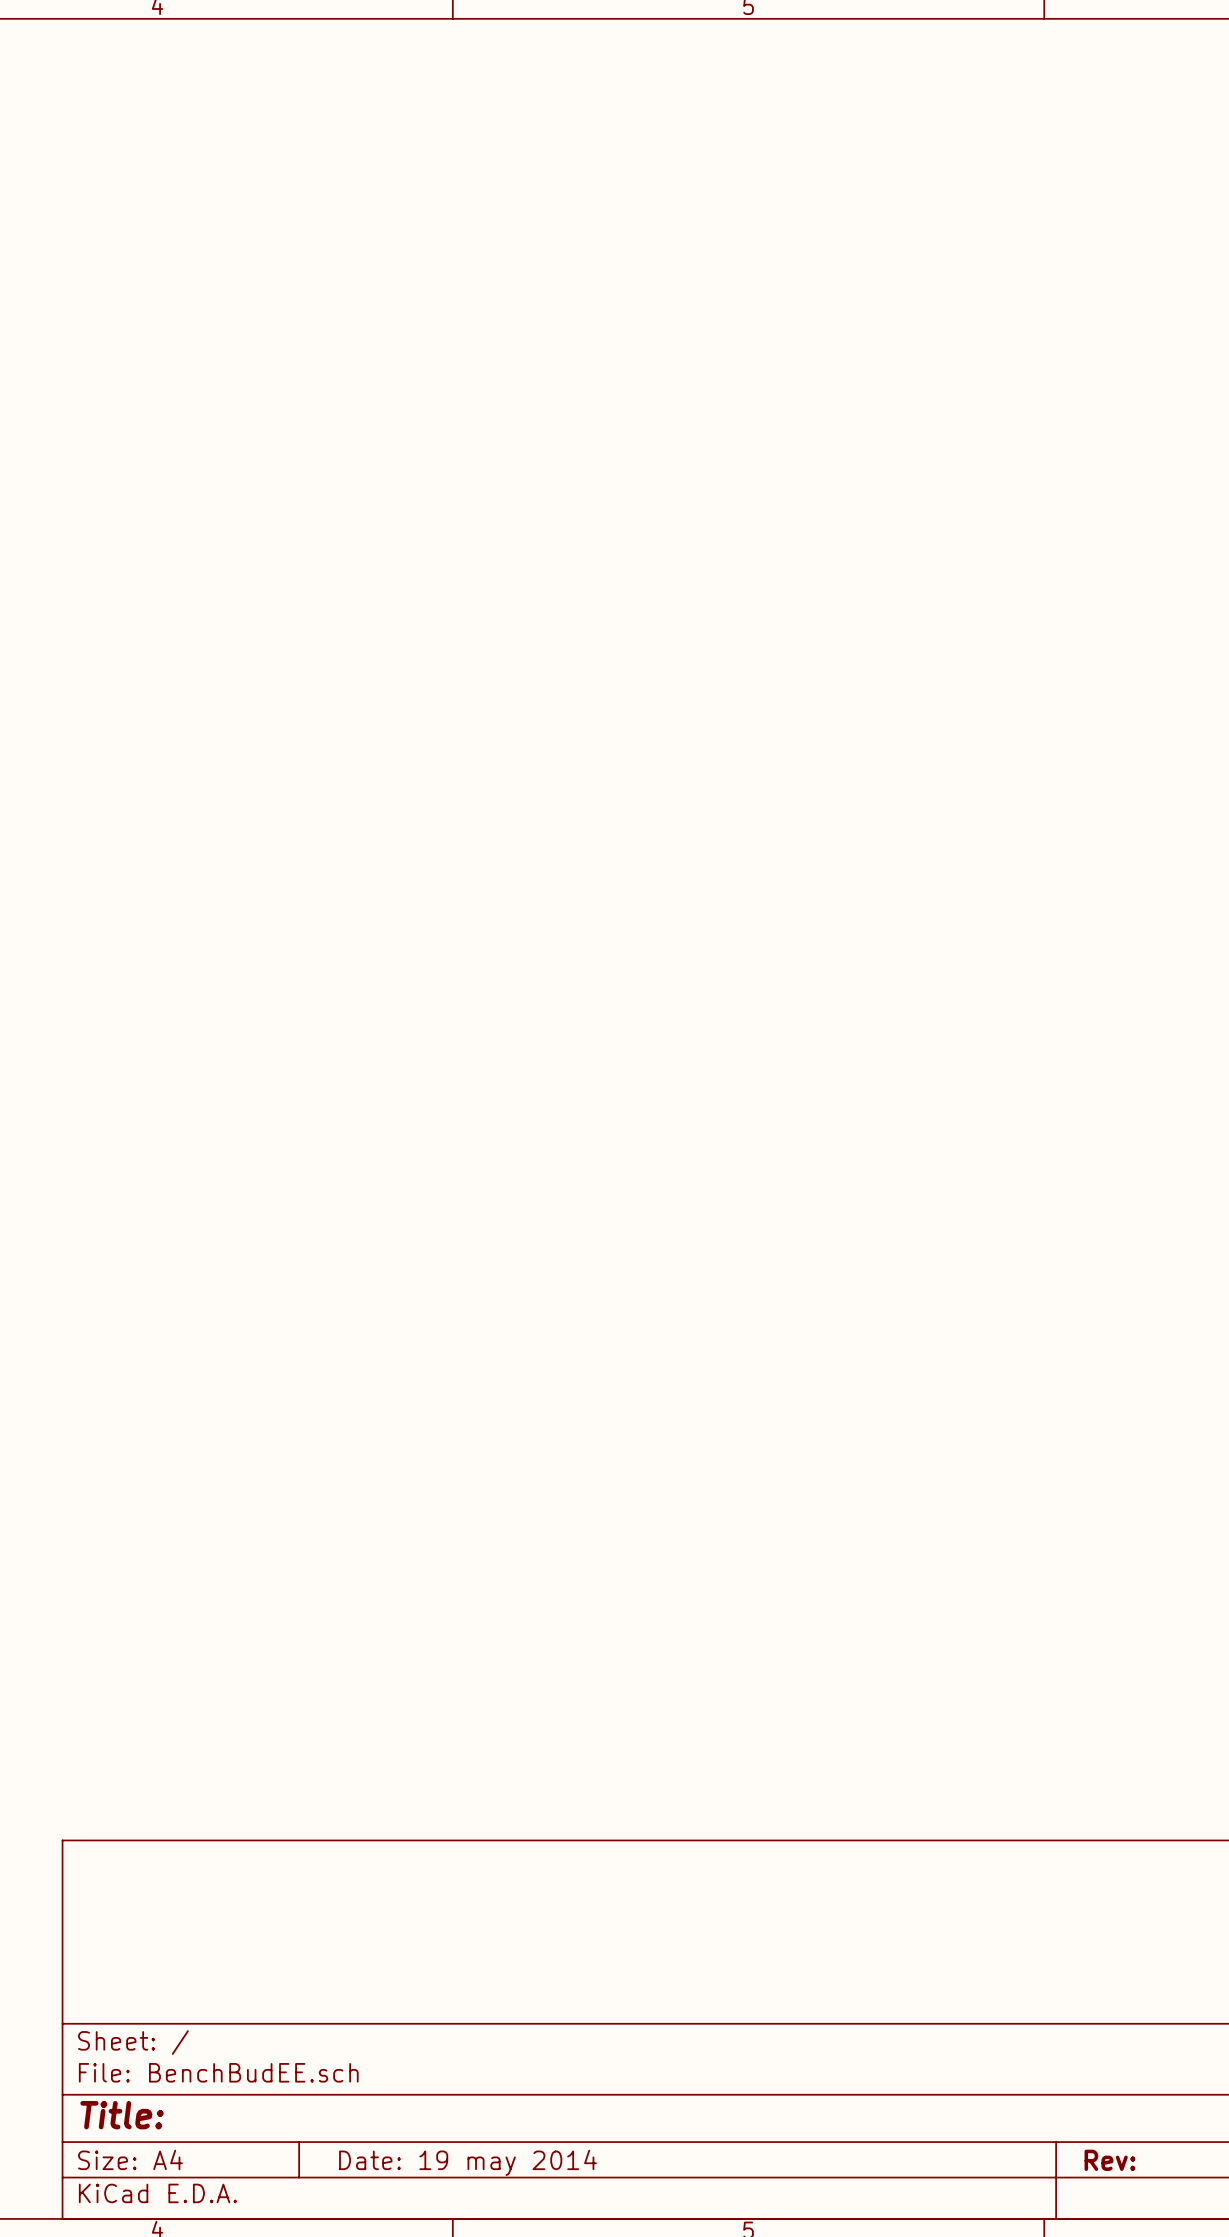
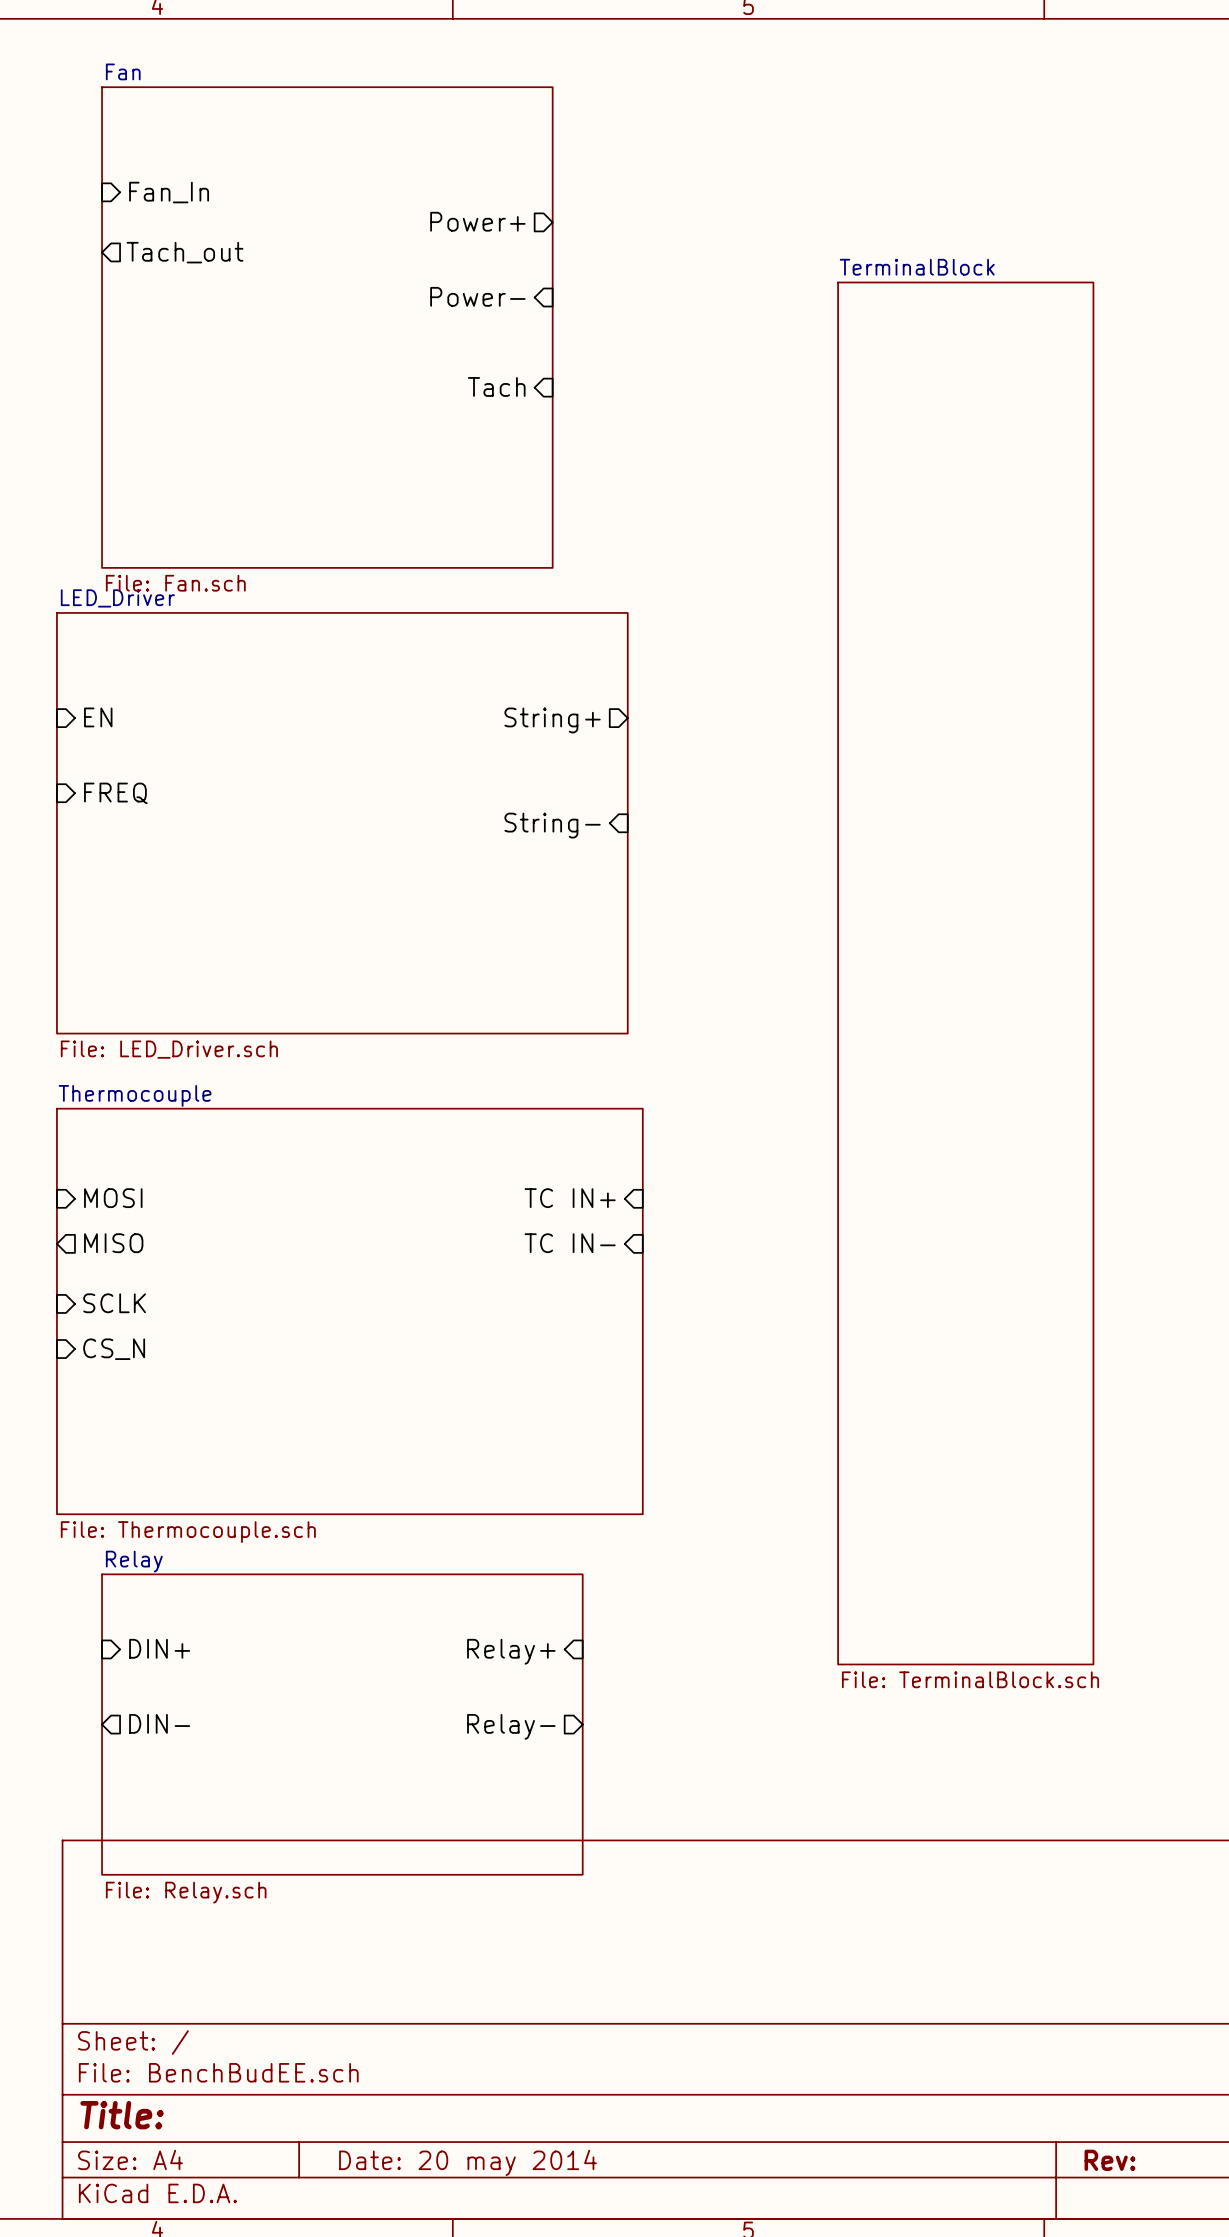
sheet pin: none -> Fan_In (169, 192)
sheet pin: none -> Power+ (477, 221)
sheet pin: none -> Tach_out (184, 252)
sheet pin: none -> Power- (477, 296)
sheet Fan: none -> File: Fan.sch (327, 327)
sheet pin: none -> Tach (496, 386)
sheet pin: none -> EN (98, 717)
sheet pin: none -> String+ (552, 720)
sheet pin: none -> FREQ (115, 793)
sheet LED_Driver: none -> File: LED_Driver.sch (342, 823)
sheet pin: none -> String- (552, 825)
sheet TerminalBlock: none -> File: TerminalBlock.sch (965, 973)
sheet pin: none -> MOSI (113, 1198)
sheet pin: none -> TC IN+ (570, 1198)
sheet pin: none -> MISO (113, 1243)
sheet pin: none -> TC IN- (570, 1243)
sheet pin: none -> SCLK (114, 1303)
sheet Thermocouple: none -> File: Thermocouple.sch (349, 1311)
sheet pin: none -> CS_N (114, 1349)
sheet pin: none -> DIN+ (159, 1648)
sheet pin: none -> Relay+ (511, 1651)
sheet pin: none -> DIN- (159, 1723)
sheet Relay: none -> File: Relay.sch (342, 1724)
sheet pin: none -> Relay- (511, 1726)
title block: Date: 19 may 2014 (467, 2162) -> Date: 20 may 2014 (467, 2162)

